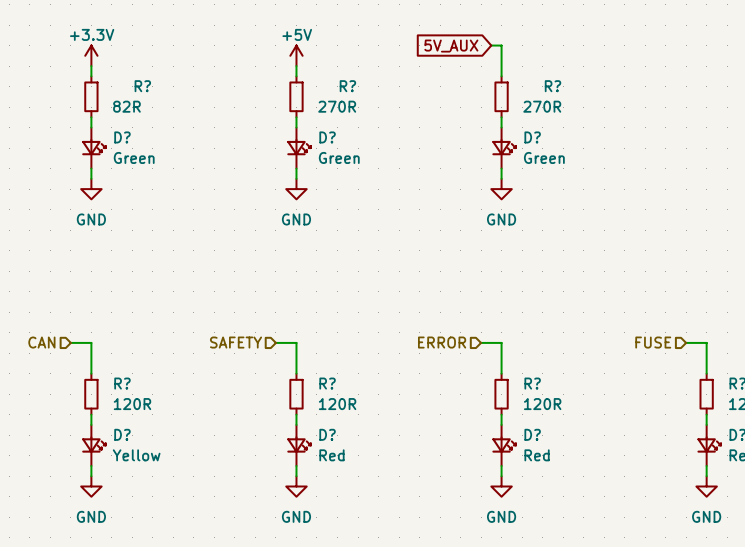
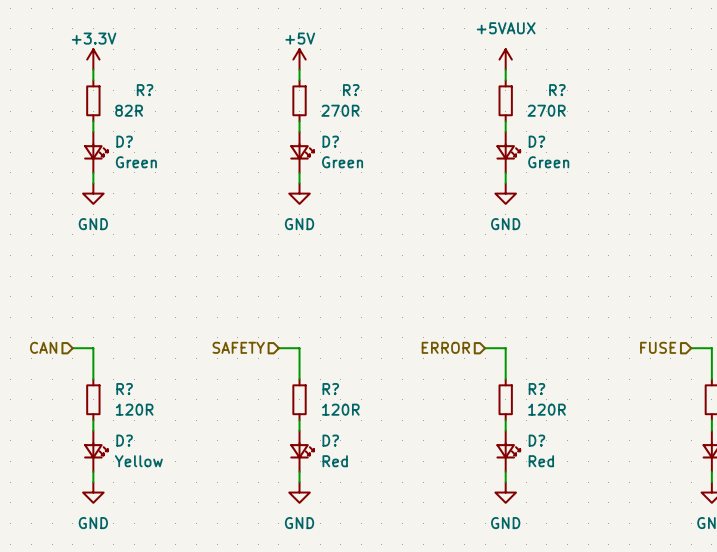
global label: 5V_AUX (451, 46) -> none
power symbol: none -> +5VAUX (505, 59)

